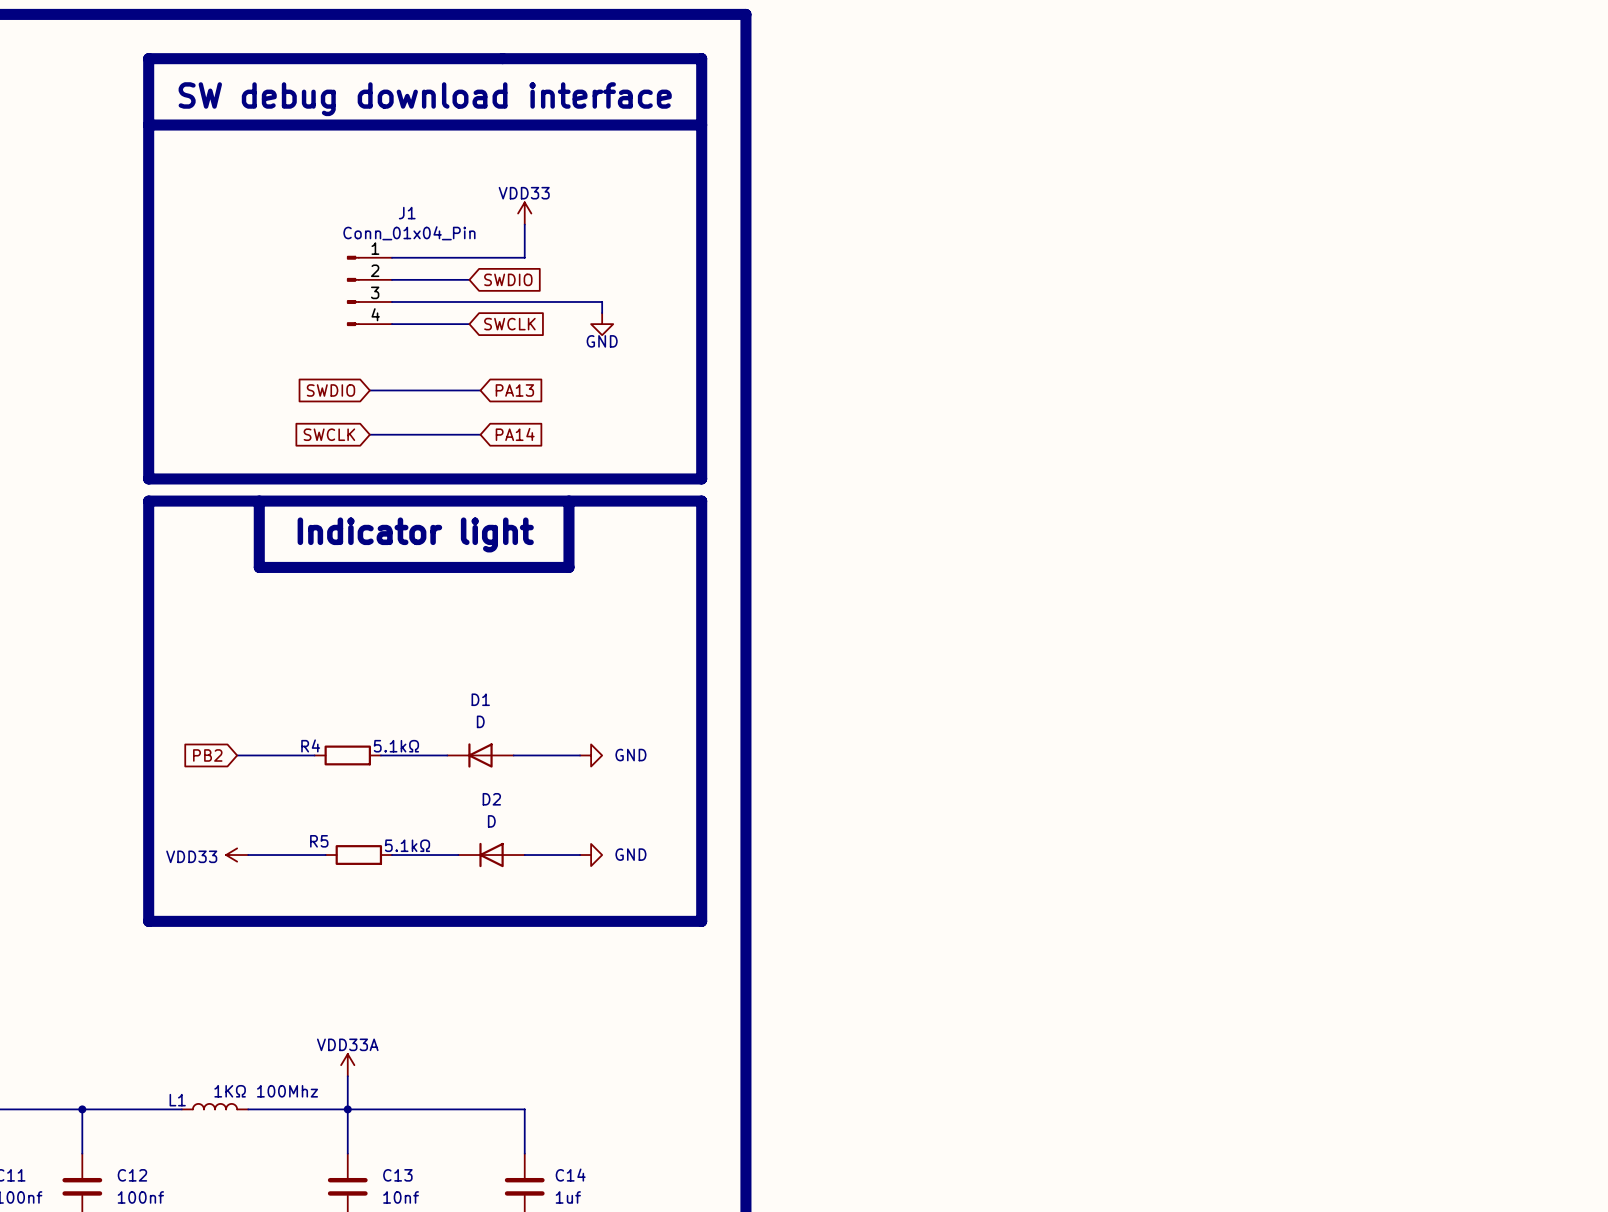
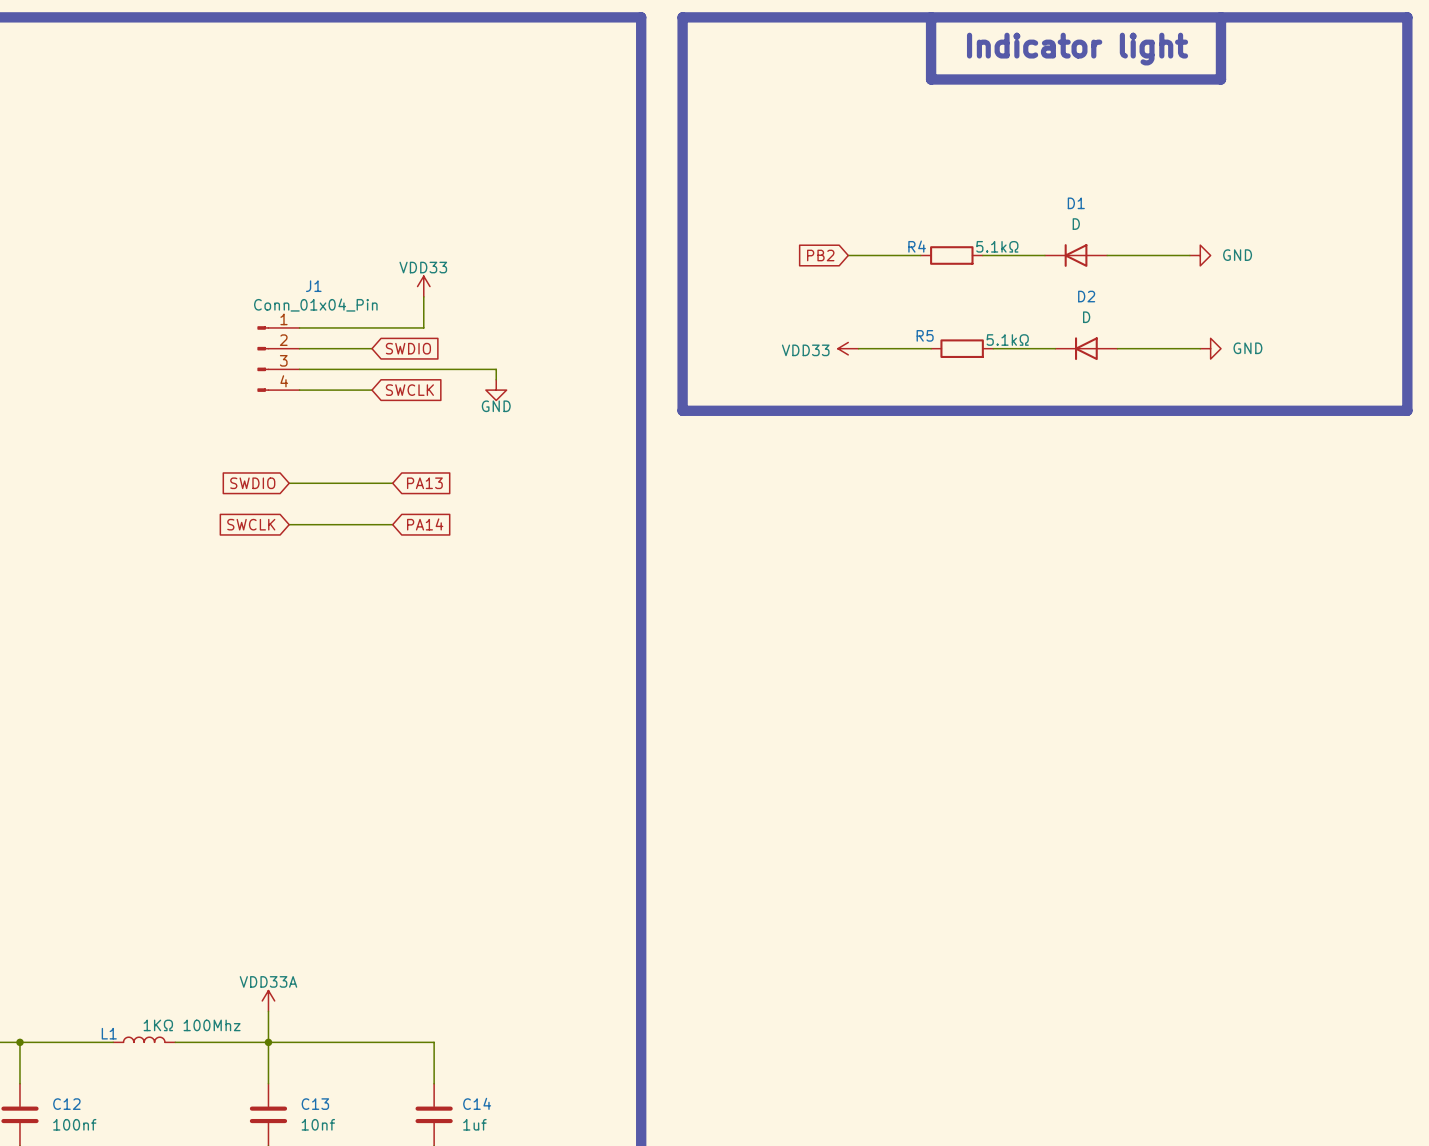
line: none -> (682, 17) (682, 410) (1407, 410) (1407, 17) (682, 17)
line: none -> (931, 17) (931, 79) (1220, 79) (1220, 17)
text: none -> Indicator light (1077, 49)
line: (148, 58) (148, 478) (701, 478) (701, 58) (148, 58) -> none
text: SW debug download interface (425, 99) -> none
line: (148, 125) (701, 125) -> none
power symbol position: VDD33 (524, 213) -> VDD33 (423, 286)
wire: (524, 224) (524, 257) (392, 257) -> (423, 296) (423, 327) (299, 327)
global label: none -> PB2 (820, 255)
wire: none -> (848, 255) (920, 255)
wire: none -> (982, 255) (1044, 255)
wire: none -> (1107, 255) (1189, 255)
power symbol: none -> GND (1200, 255)
wire: (392, 279) (469, 279) -> (299, 348) (372, 348)
global label: SWDIO (508, 279) -> none
J1 position: (369, 290) -> (278, 359)
wire: (392, 301) (602, 301) (602, 313) -> none
wire: (392, 324) (469, 324) -> (299, 390) (372, 390)
global label: SWCLK (509, 324) -> none
power symbol position: GND (602, 324) -> GND (496, 390)
global label: none -> SWDIO (408, 348)
power symbol: none -> VDD33 (848, 348)
wire: none -> (858, 348) (931, 348)
wire: none -> (993, 348) (1055, 348)
wire: none -> (1117, 348) (1200, 348)
power symbol: none -> GND (1210, 348)
global label: SWDIO (330, 390) -> none
wire: none -> (392, 369) (496, 369) (496, 379)
global label position: PA13 (514, 390) -> PA13 (424, 483)
global label: none -> SWCLK (409, 390)
global label: SWCLK (329, 434) -> none
wire: (369, 434) (480, 434) -> (289, 483) (392, 483)
global label position: PA14 (515, 434) -> PA14 (425, 524)
line: (148, 501) (148, 921) (701, 921) (701, 501) (148, 501) -> none
line: (259, 501) (259, 567) (568, 567) (568, 501) -> none
global label: none -> SWDIO (252, 483)
text: Indicator light (415, 534) -> none
global label: none -> SWCLK (251, 524)
wire: none -> (289, 524) (392, 524)
global label: PB2 (207, 755) -> none
wire: (237, 755) (314, 755) -> none
R4 position: (347, 755) -> (951, 255)
wire: (380, 755) (447, 755) -> none
D1 position: (480, 755) -> (1076, 255)
wire: (513, 755) (580, 755) -> none
power symbol: GND (591, 755) -> none
power symbol: VDD33 (237, 855) -> none
wire: (248, 855) (325, 855) -> none
R5 position: (358, 855) -> (962, 348)
wire: (392, 855) (458, 855) -> none
D2 position: (491, 855) -> (1086, 348)
wire: (524, 855) (580, 855) -> none
power symbol: GND (591, 855) -> none

